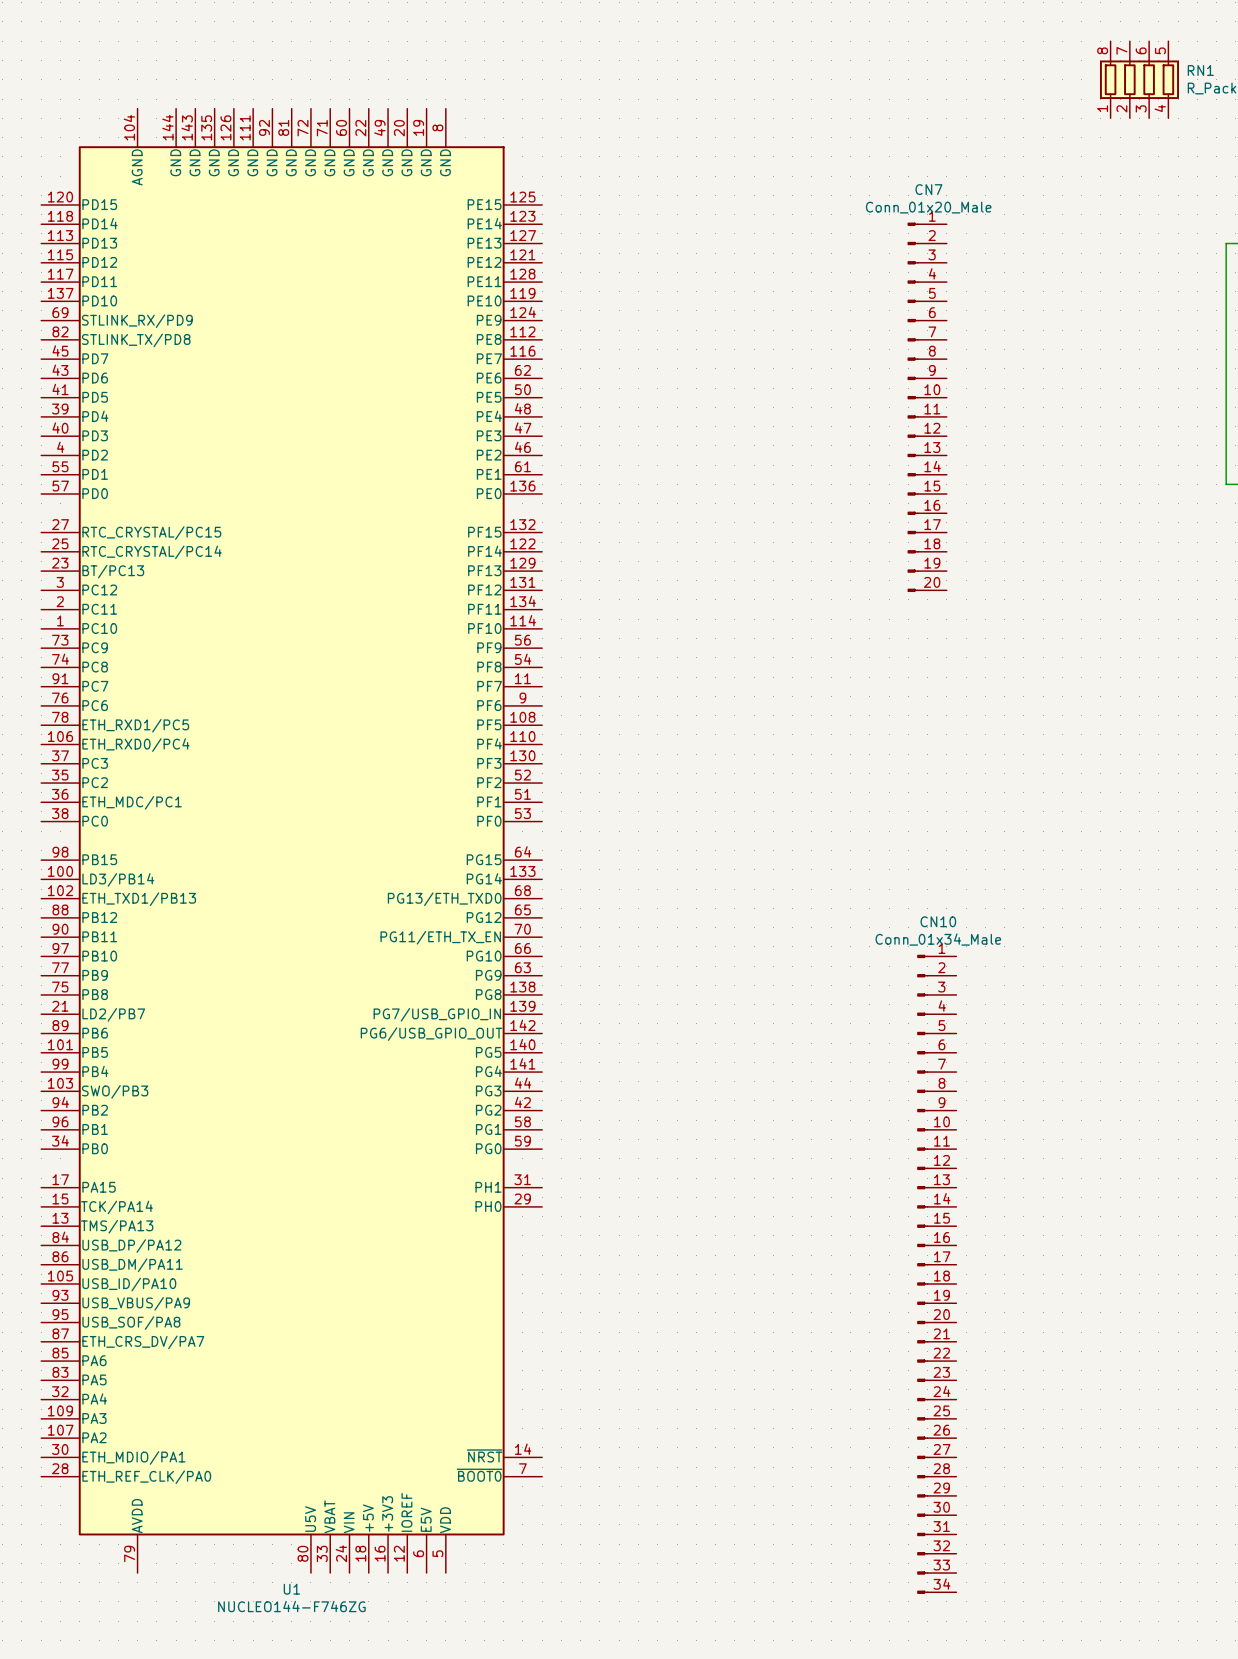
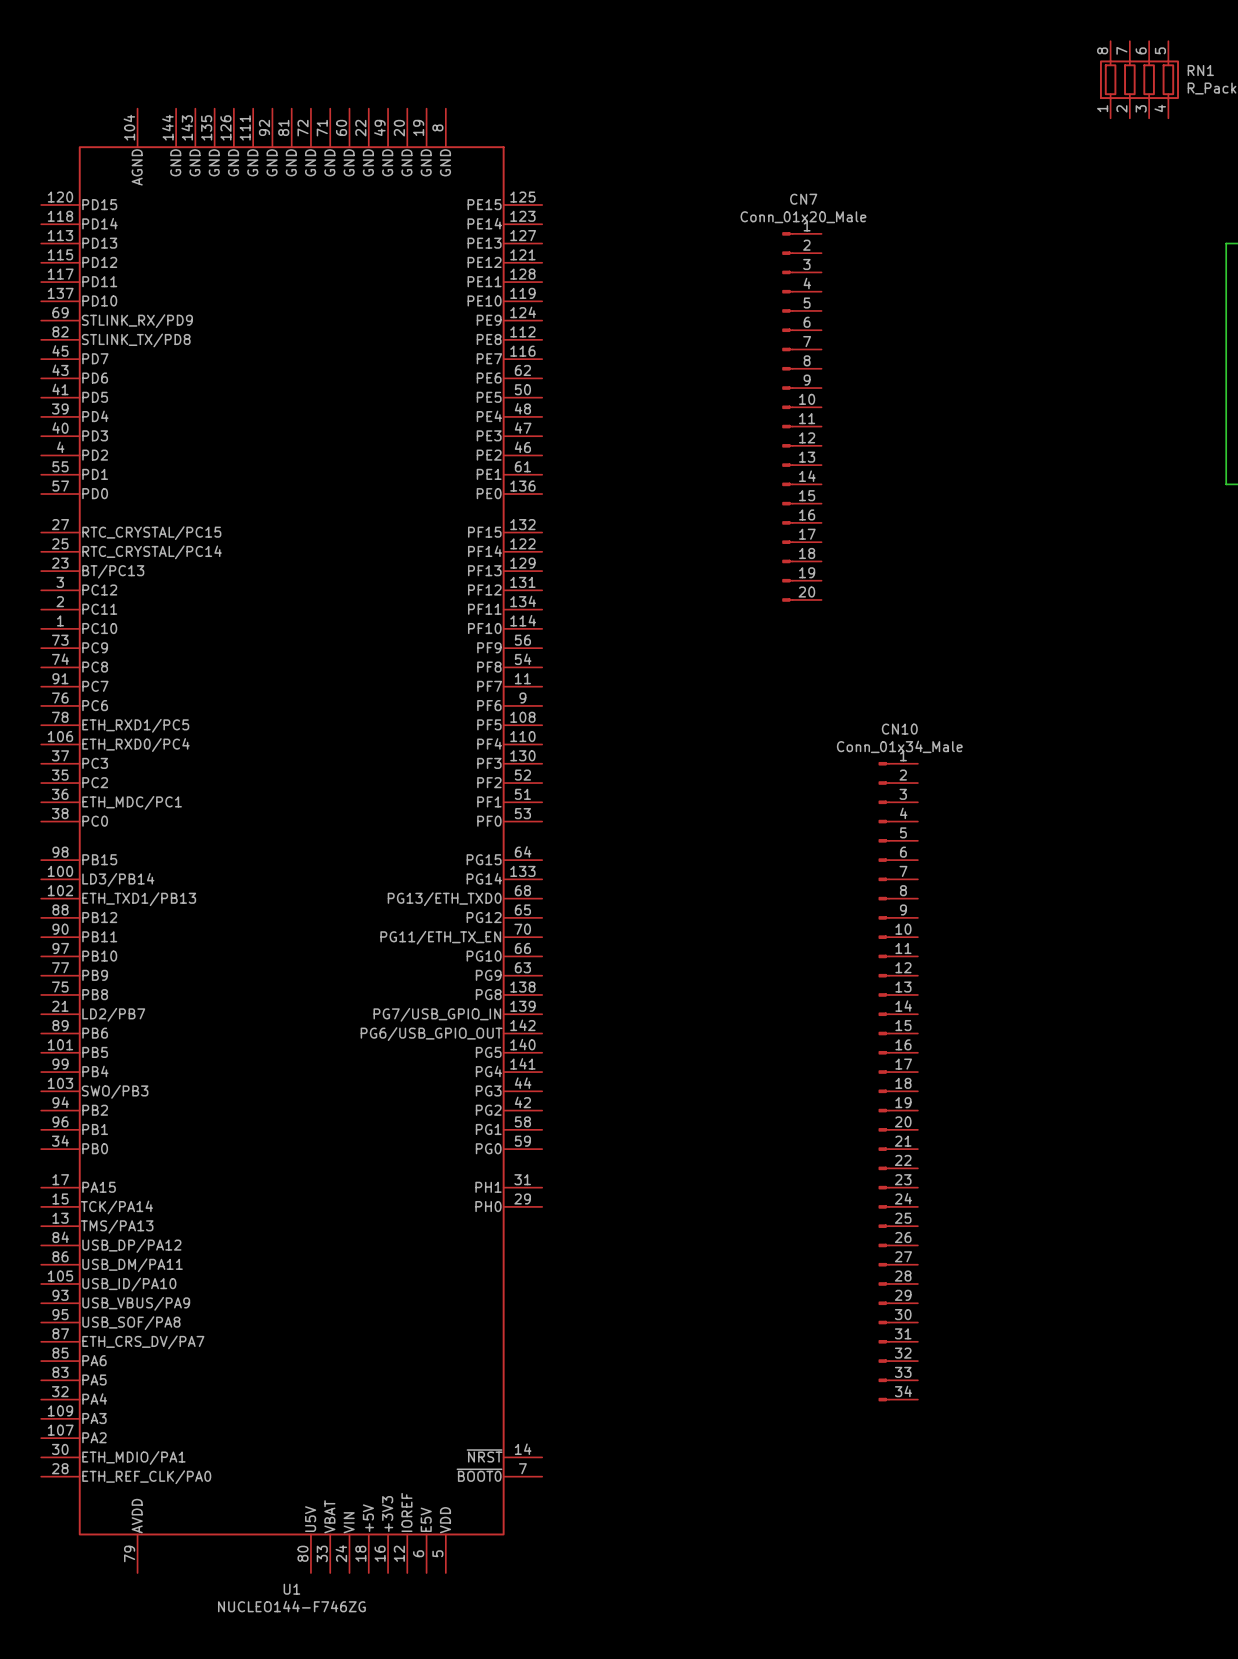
CN7 position: (927, 407) -> (802, 416)
CN10 position: (936, 1274) -> (898, 1081)

